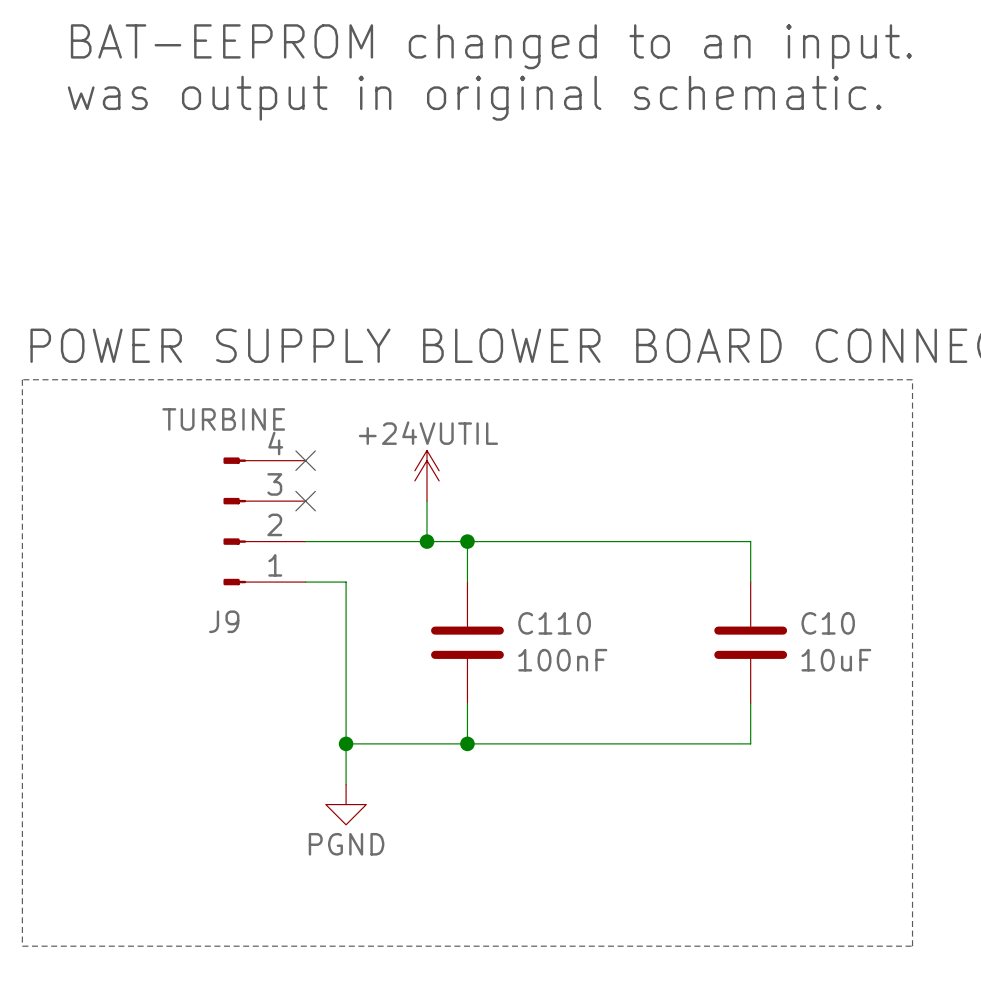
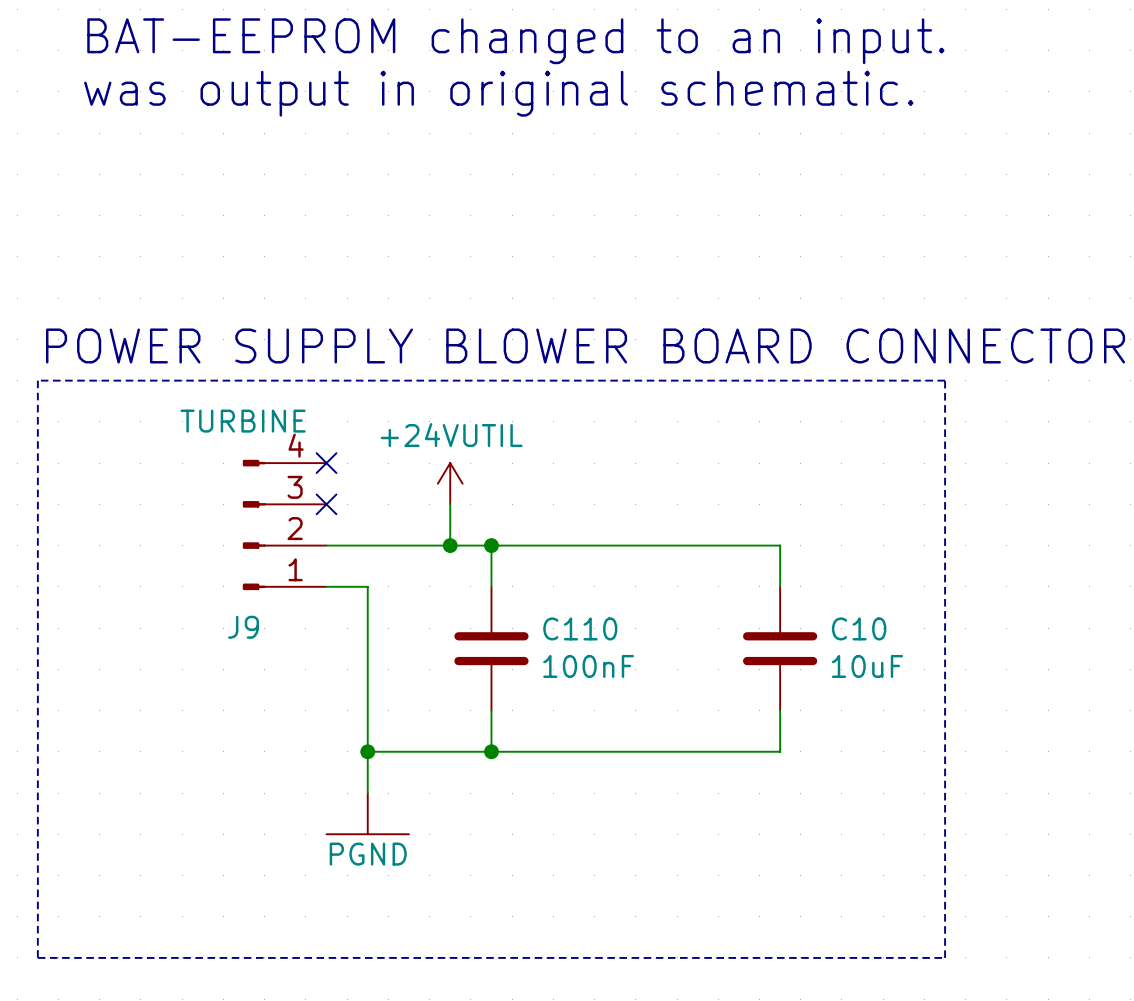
power symbol shape: [414, 450, 440, 502] -> [437, 463, 463, 505]
power symbol shape: [325, 784, 367, 825] -> [326, 793, 409, 835]

